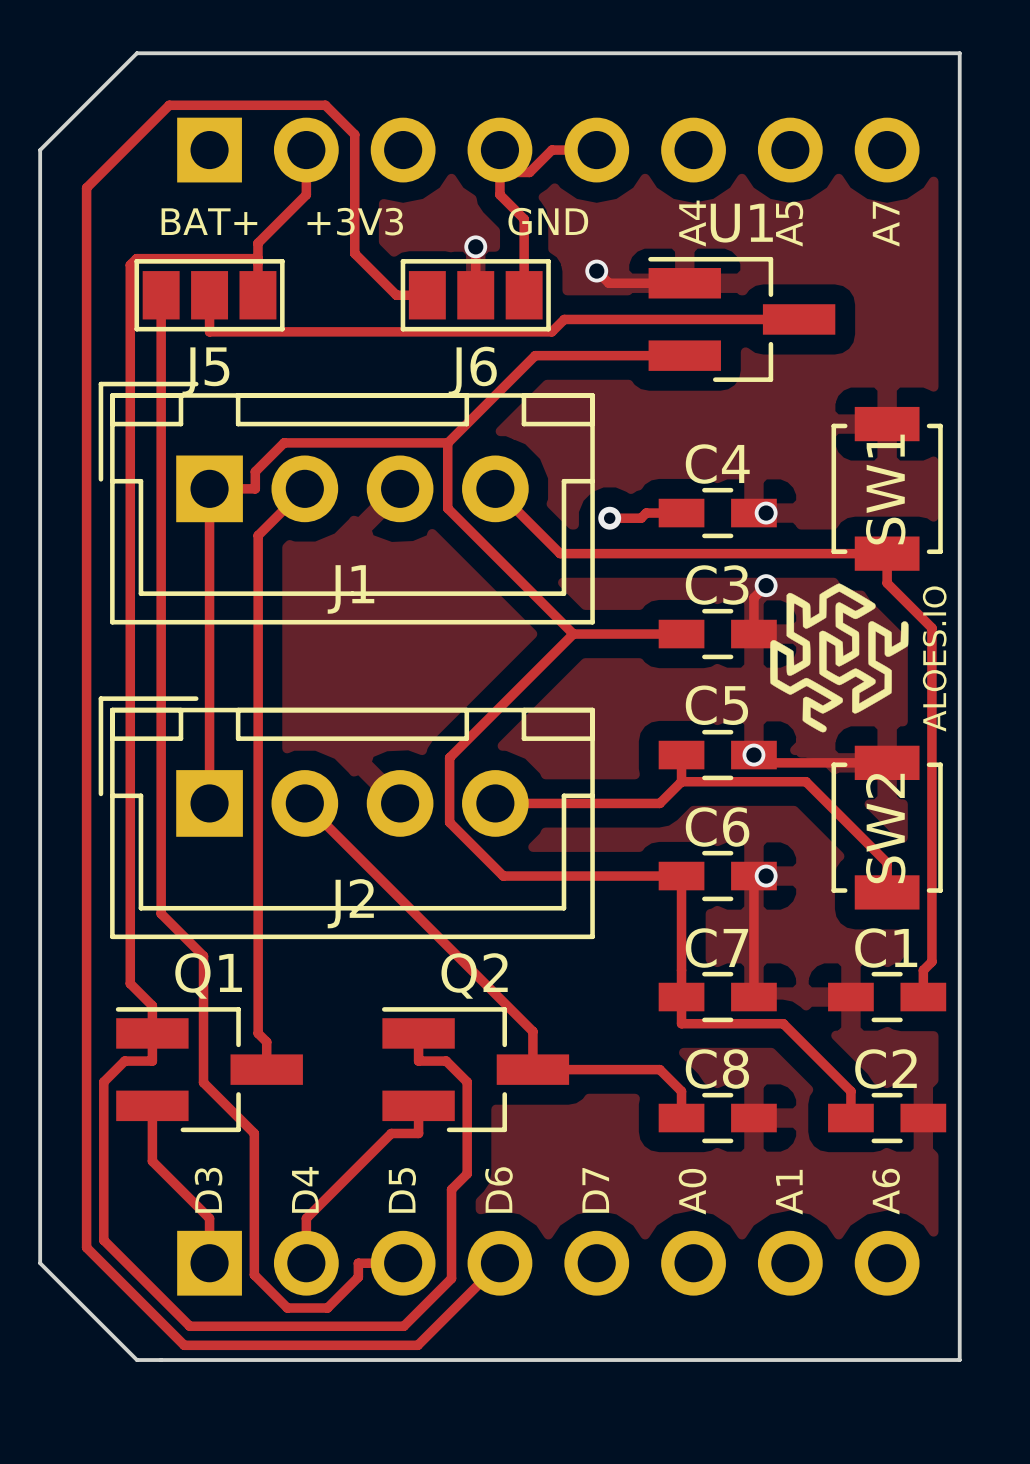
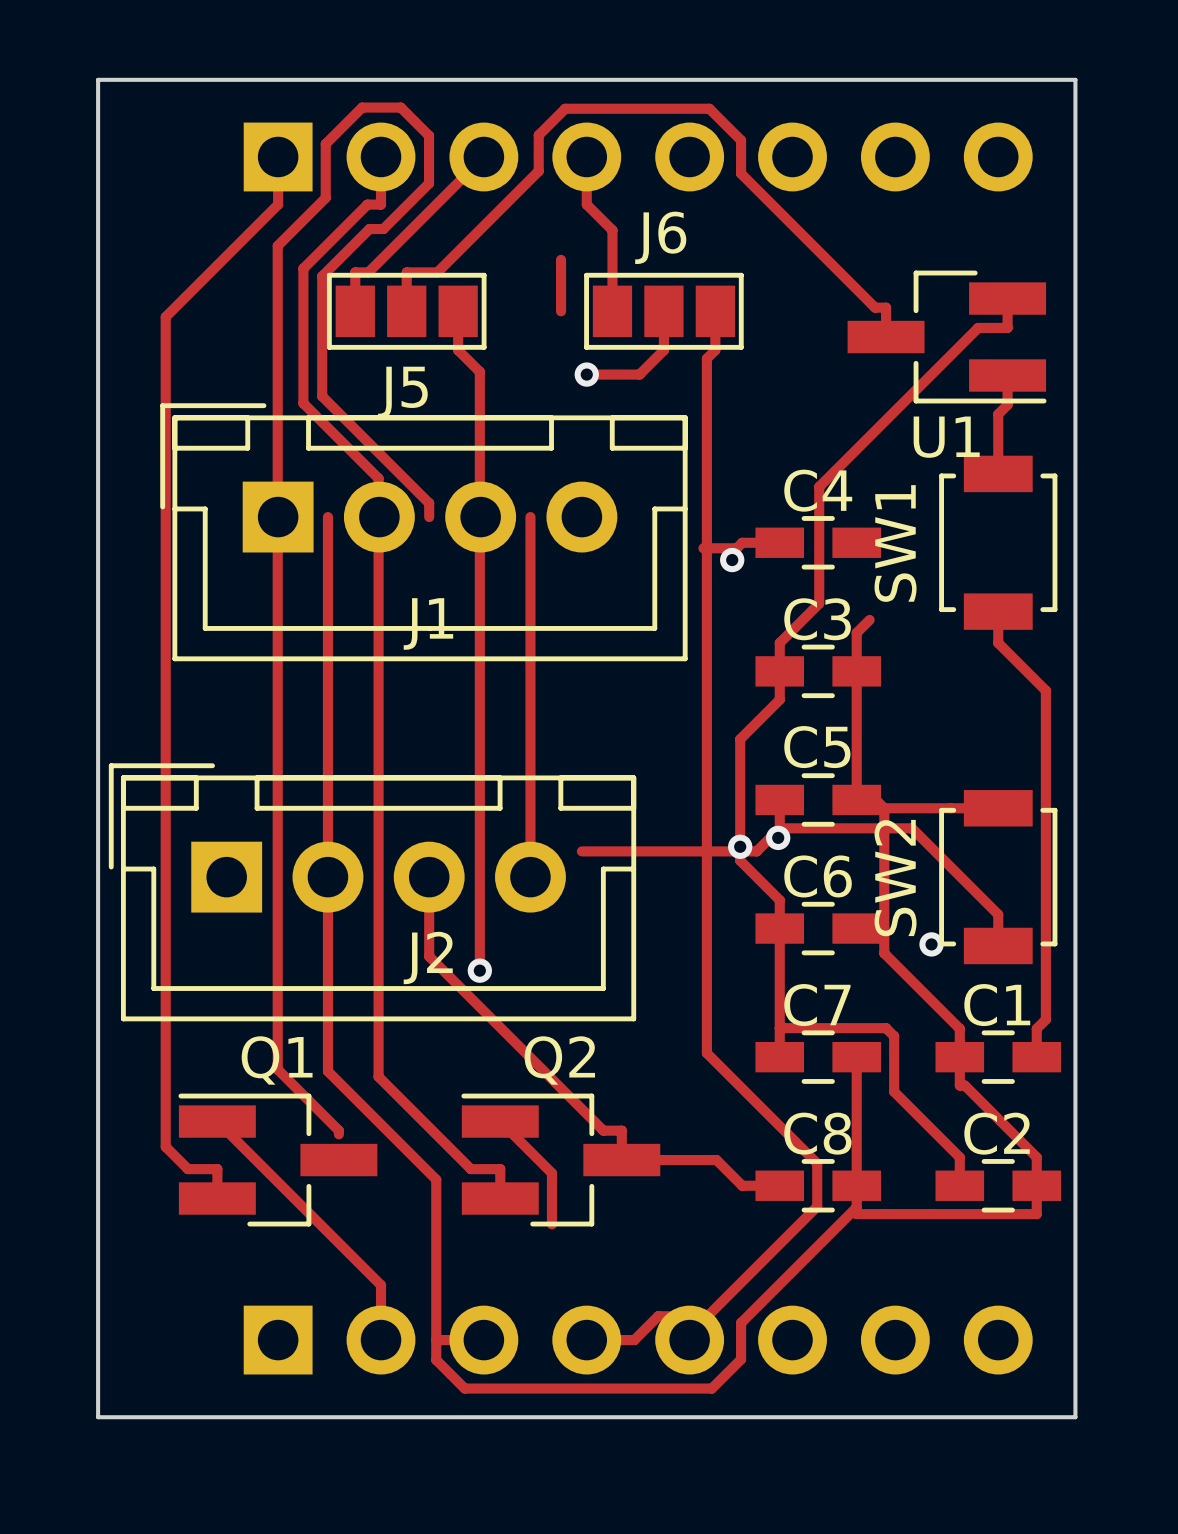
board edge: (959, 77) (959, 53) (136, 53) (40, 150) -> (1075, 79) (98, 79) (98, 156)
track: none -> (278, 156) (278, 204) (165, 317) (165, 1146) (188, 1169) (217, 1169) (217, 1172)
track: none -> (483, 156) (368, 272) (355, 272) (355, 311)
track: (596, 150) (551, 150) (529, 172) (499, 172) -> none
track: (306, 194) (257, 243) (257, 295) -> (381, 204) (367, 204) (303, 268) (303, 403) (378, 478) (378, 1076) (470, 1169) (500, 1169) (500, 1172)
text: BAT+ (209, 221) -> none
text: +3V3 (355, 221) -> none
text: GND (548, 221) -> none
text: A4 (692, 223) -> none
text: A5 (789, 224) -> none
text: A7 (886, 224) -> none
via: (475, 246) -> none
track: (257, 258) (136, 258) (130, 265) (130, 983) (152, 1005) (152, 1061) (124, 1061) (103, 1082) (103, 1240) (189, 1326) (403, 1326) (451, 1278) (451, 1189) (467, 1173) (467, 1154) -> none
track: (596, 271) (608, 283) (684, 283) -> none
via: (596, 271) -> none
track: (161, 295) (161, 913) (203, 956) (203, 1082) (254, 1133) (254, 1274) (287, 1308) (327, 1308) (358, 1277) -> (856, 1207) (741, 1322) (741, 1359) (711, 1388) (464, 1388) (436, 1360) (436, 1354)
track: (209, 295) (209, 331) (551, 331) (564, 319) (799, 319) -> none
J5 position: (209, 295) -> (406, 311)
track: none -> (406, 311) (406, 272) (437, 272) (538, 171) (538, 135) (565, 108) (709, 108) (741, 140) (741, 173) (875, 307) (886, 307) (886, 337)
track: none -> (458, 311) (458, 350) (479, 371) (479, 970)
track: (427, 295) (396, 295) (354, 253) (354, 134) (325, 105) (169, 105) (86, 187) (86, 1247) (184, 1345) (417, 1345) (499, 1263) -> (715, 311) (715, 350) (706, 358) (706, 1053) (817, 1163) (817, 1206) (707, 1316) (658, 1316) (634, 1340) (586, 1340)
J6 position: (475, 295) -> (663, 311)
track: none -> (663, 311) (663, 350) (639, 374) (586, 374)
U1 rotation: 0° (741, 319) -> 180° (947, 337)
via: none -> (586, 374)
track: (684, 355) (535, 355) (447, 443) (447, 508) (573, 634) -> none
track: none -> (1007, 375) (1007, 404) (998, 414) (998, 473)
J6 name position: J6 (472, 371) -> J6 (660, 237)
track: (447, 442) (284, 442) (255, 471) (255, 488) (209, 488) (209, 803) -> none
track: none -> (327, 517) (327, 1071) (436, 1179) (436, 1340)
track: (304, 488) (258, 535) (258, 1033) (266, 1041) (266, 1066) -> (429, 517) (429, 503) (322, 396) (322, 276) (369, 229) (383, 229) (429, 183) (429, 135) (400, 107) (362, 107) (325, 143) (325, 197) (277, 245) (277, 1069) (338, 1130)
track: none -> (530, 517) (530, 877)
track: (495, 488) (560, 553) (887, 553) (887, 577) -> none
SW1 position: (887, 488) -> (998, 542)
SW1 name position: SW1 (885, 489) -> SW1 (895, 543)
via: (766, 513) -> none
via position: (609, 518) -> (732, 560)
drawing: [770, 583, 909, 733] -> none
track: (887, 583) (931, 627) (931, 652) -> (998, 617) (998, 643) (1045, 690)
via: (766, 585) -> none
track: (573, 634) (449, 757) (449, 822) (503, 876) (681, 876) -> (1007, 298) (1007, 327) (978, 327) (819, 486) (819, 603) (779, 643) (779, 699) (740, 739) (740, 860) (779, 900) (779, 928)
track: (573, 634) (681, 634) -> none
text: ALOES.IO (934, 659) -> none
via: (753, 755) -> none
via: none -> (778, 837)
via: none -> (740, 846)
track: (304, 803) (532, 1031) (532, 1066) -> (429, 877) (429, 956) (603, 1130) (621, 1130)
J2 position: (346, 817) -> (372, 892)
SW2 name position: SW2 (885, 828) -> SW2 (895, 878)
track: (753, 876) (753, 997) -> (856, 671) (856, 799) (876, 799) (884, 808) (884, 953) (959, 1028) (959, 1085) (964, 1085) (1036, 1157) (1036, 1214) (856, 1214) (856, 1057)
via: (766, 876) -> none
via: none -> (931, 944)
via: none -> (479, 970)
track: (681, 997) (681, 1023) (783, 1023) (789, 1029) -> (779, 1028) (886, 1028) (894, 1036) (894, 1091)
track: (418, 1033) (418, 1061) (446, 1061) (467, 1082) (467, 1106) -> (500, 1121) (551, 1173)
Q1 position: (209, 1069) -> (277, 1160)
Q2 position: (475, 1069) -> (560, 1160)
track: (532, 1069) (659, 1069) (681, 1091) (681, 1118) -> (621, 1134) (621, 1160) (716, 1160) (742, 1185) (779, 1185)
track: (152, 1130) (152, 1161) (209, 1218) (209, 1263) -> none
track: (418, 1130) (418, 1133) (391, 1133) (306, 1218) -> (217, 1121) (381, 1285) (381, 1292)
text: D4 (305, 1189) -> none
text: D6 (498, 1189) -> none
text: D3 (208, 1190) -> none
text: D5 (402, 1190) -> none
text: D7 (595, 1190) -> none
text: A0 (692, 1191) -> none
text: A6 (886, 1191) -> none
text: A1 (789, 1192) -> none
board edge: (40, 1263) (136, 1360) (959, 1360) (959, 1335) -> (98, 1340) (98, 1417) (1075, 1417)

